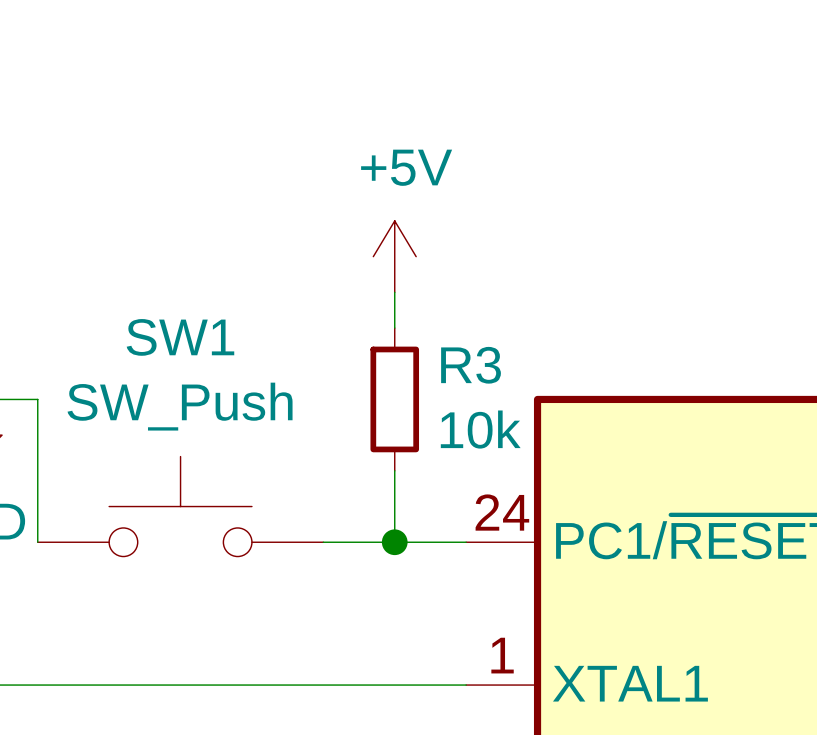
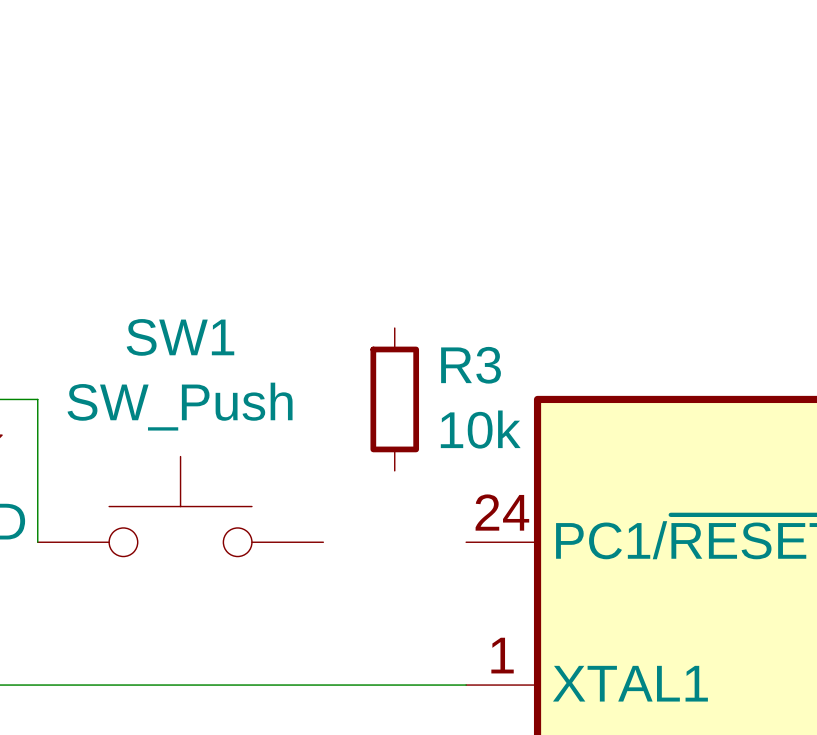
power symbol: +5V (394, 256) -> none
wire: (394, 292) (394, 328) -> none
wire: (394, 470) (394, 542) -> none
wire: (323, 542) (466, 542) -> none
junction: (394, 542) -> none

